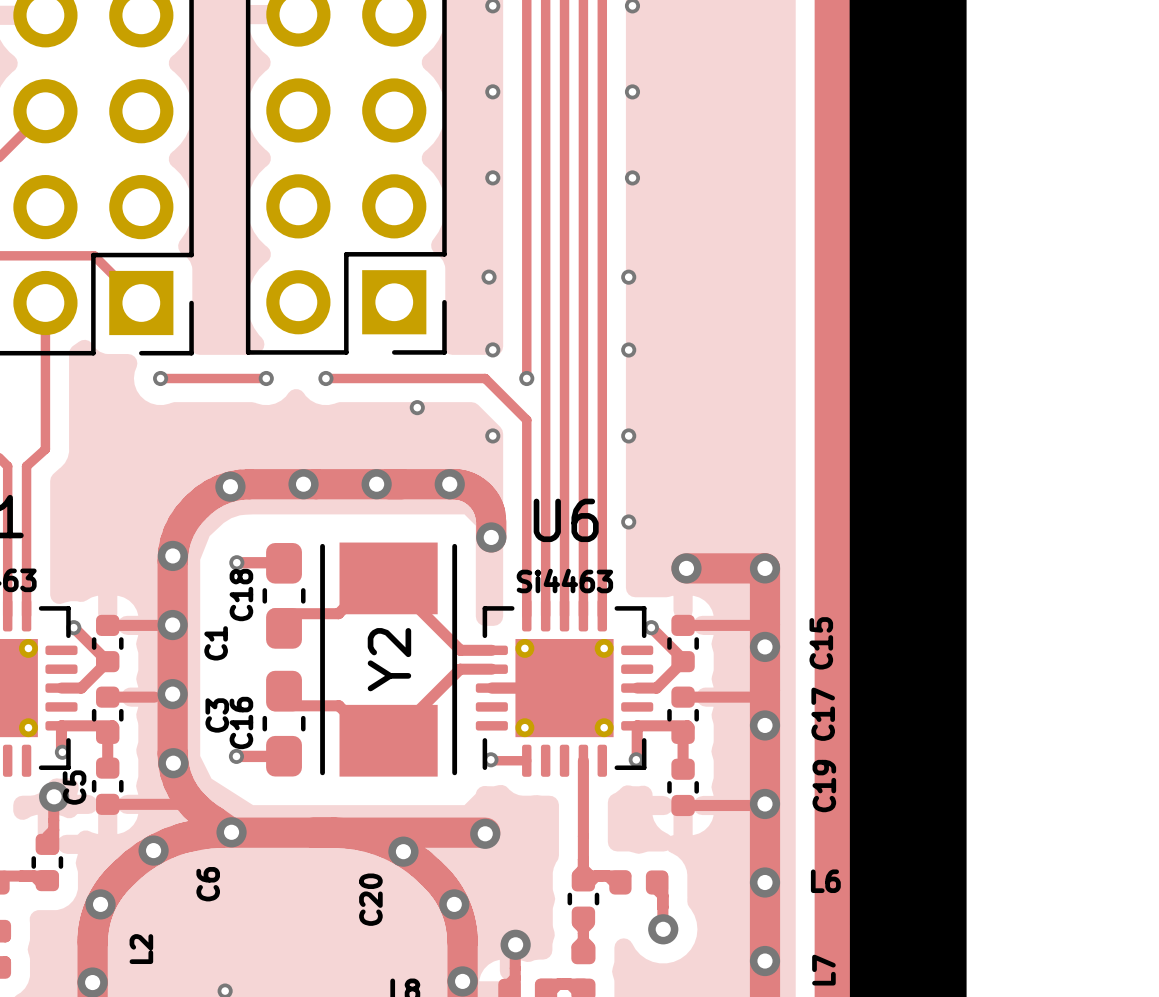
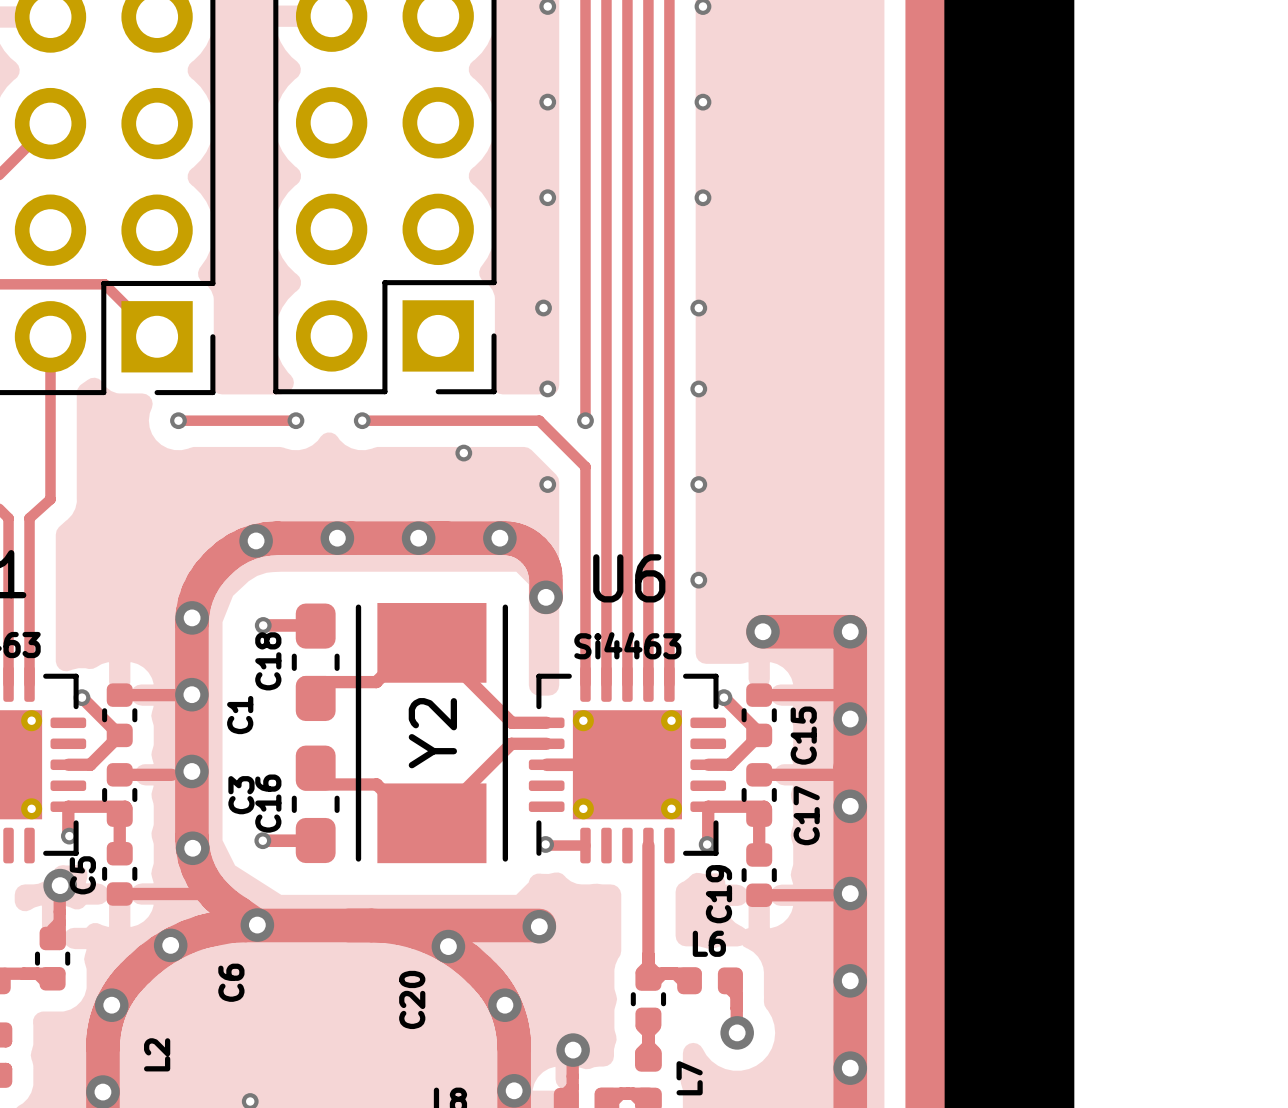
C15 name position: C15 (821, 643) -> C15 (803, 735)
C17 name position: C17 (823, 714) -> C17 (806, 815)
C19 name position: C19 (824, 786) -> C19 (718, 894)
L6 name position: L6 (825, 881) -> L6 (709, 943)
L7 name position: L7 (823, 970) -> L7 (689, 1078)

